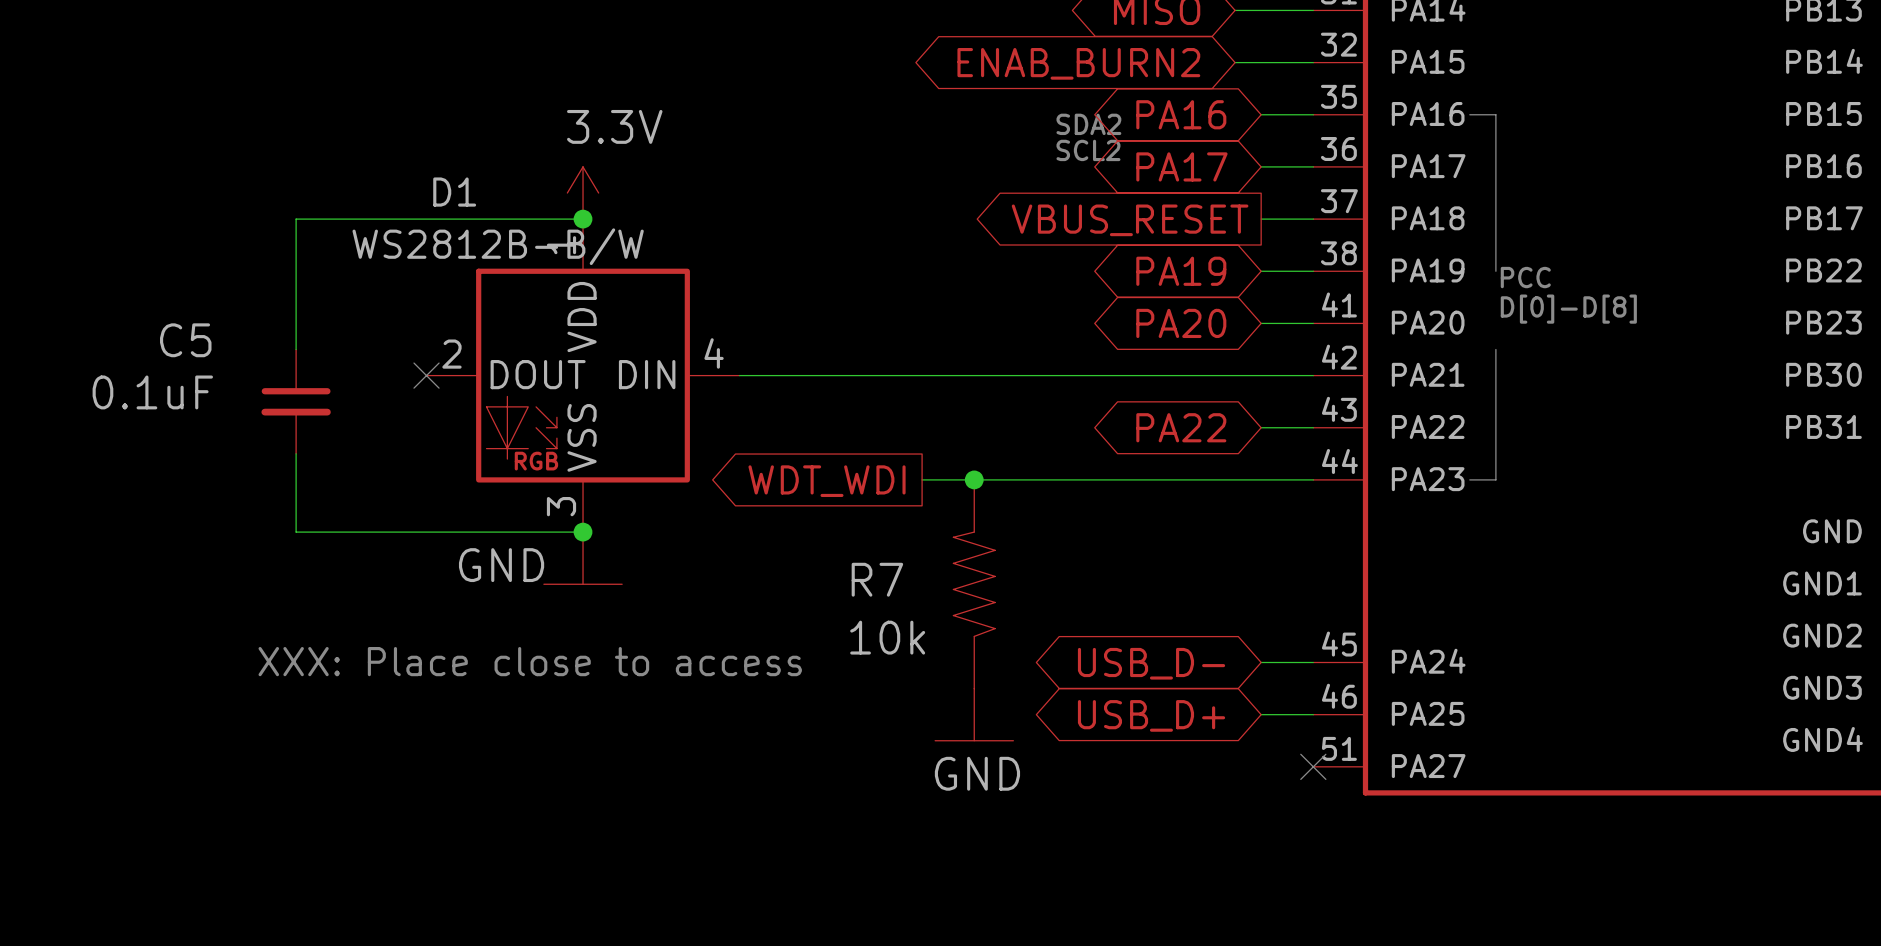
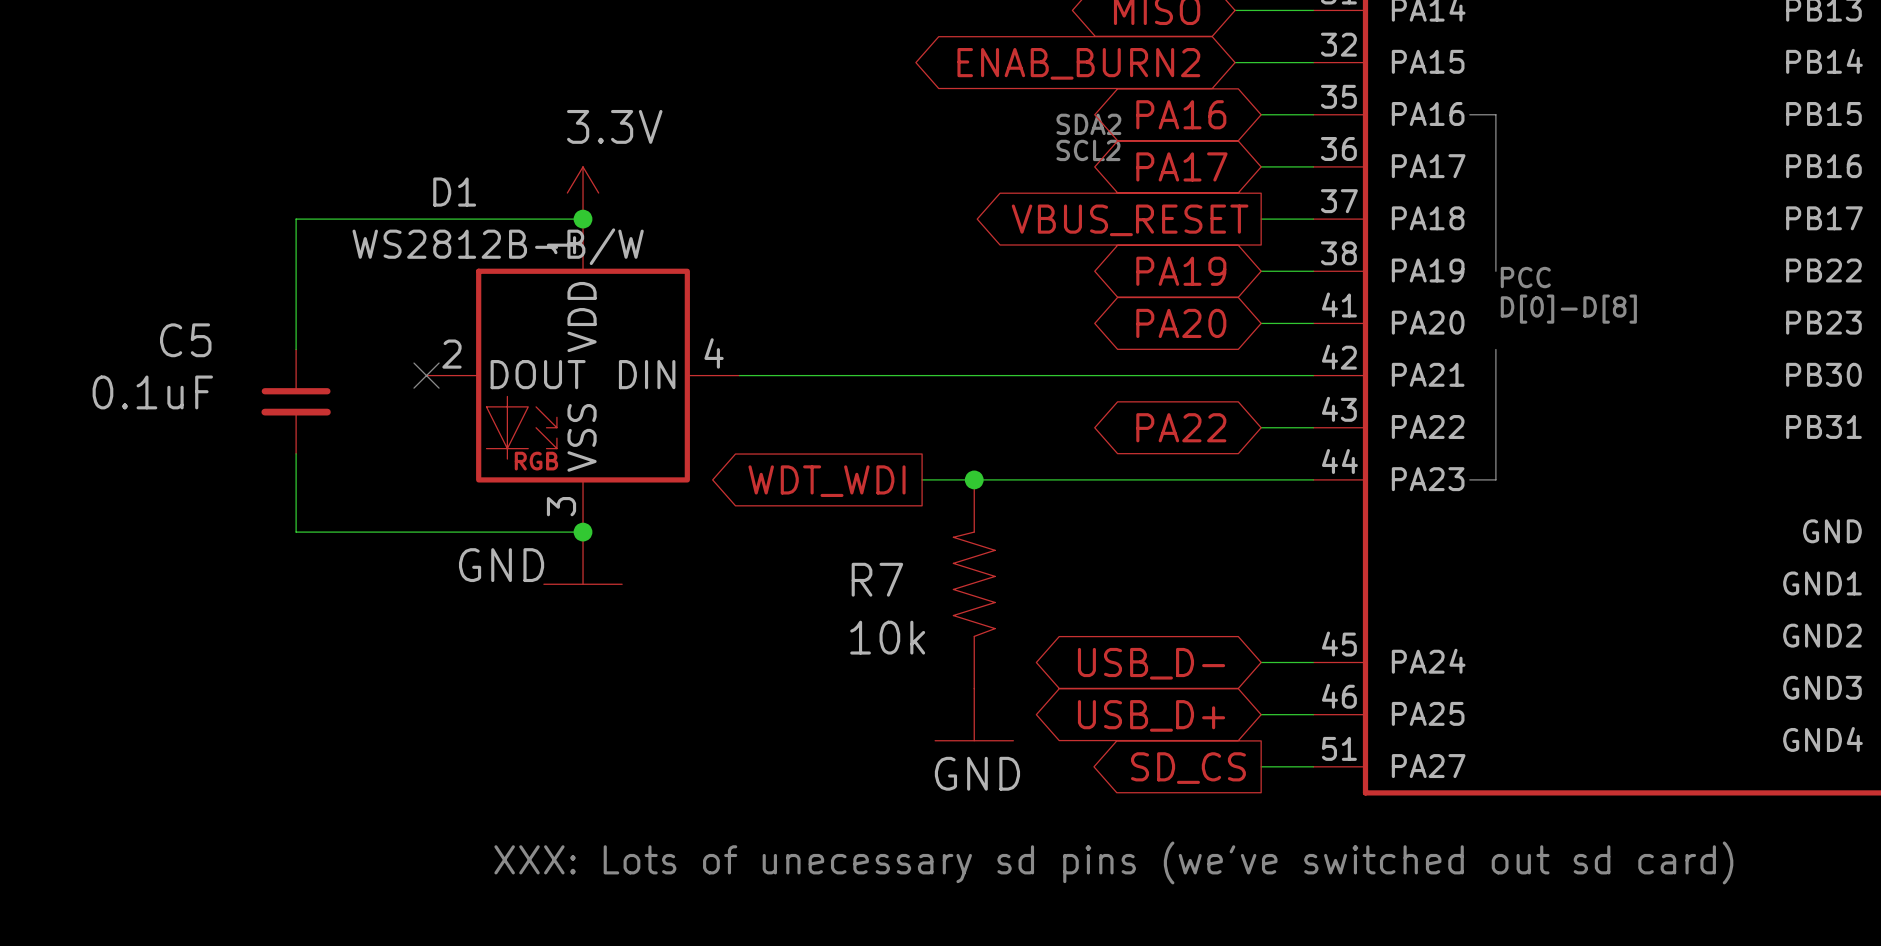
text: XXX: Place close to access (530, 661) -> none
wire: none -> (1261, 766) (1313, 766)
no-connect mark: (1313, 766) -> none
global label: none -> SD_CS (1188, 768)
text: none -> XXX: Lots of unecessary sd pins (we've switched out sd card) (1113, 862)

